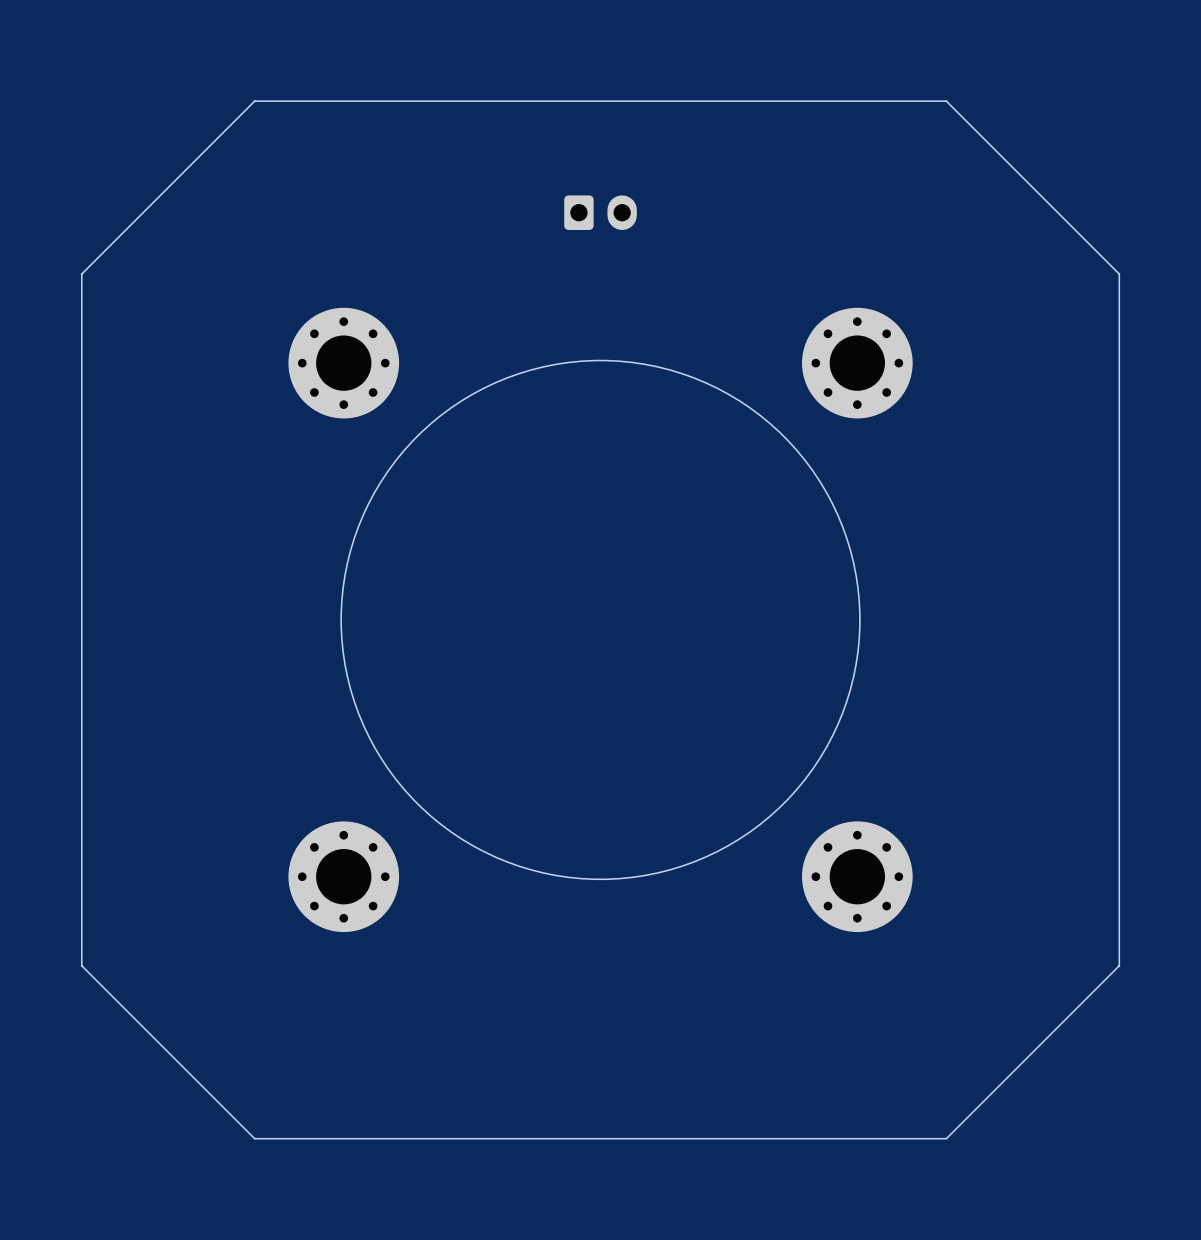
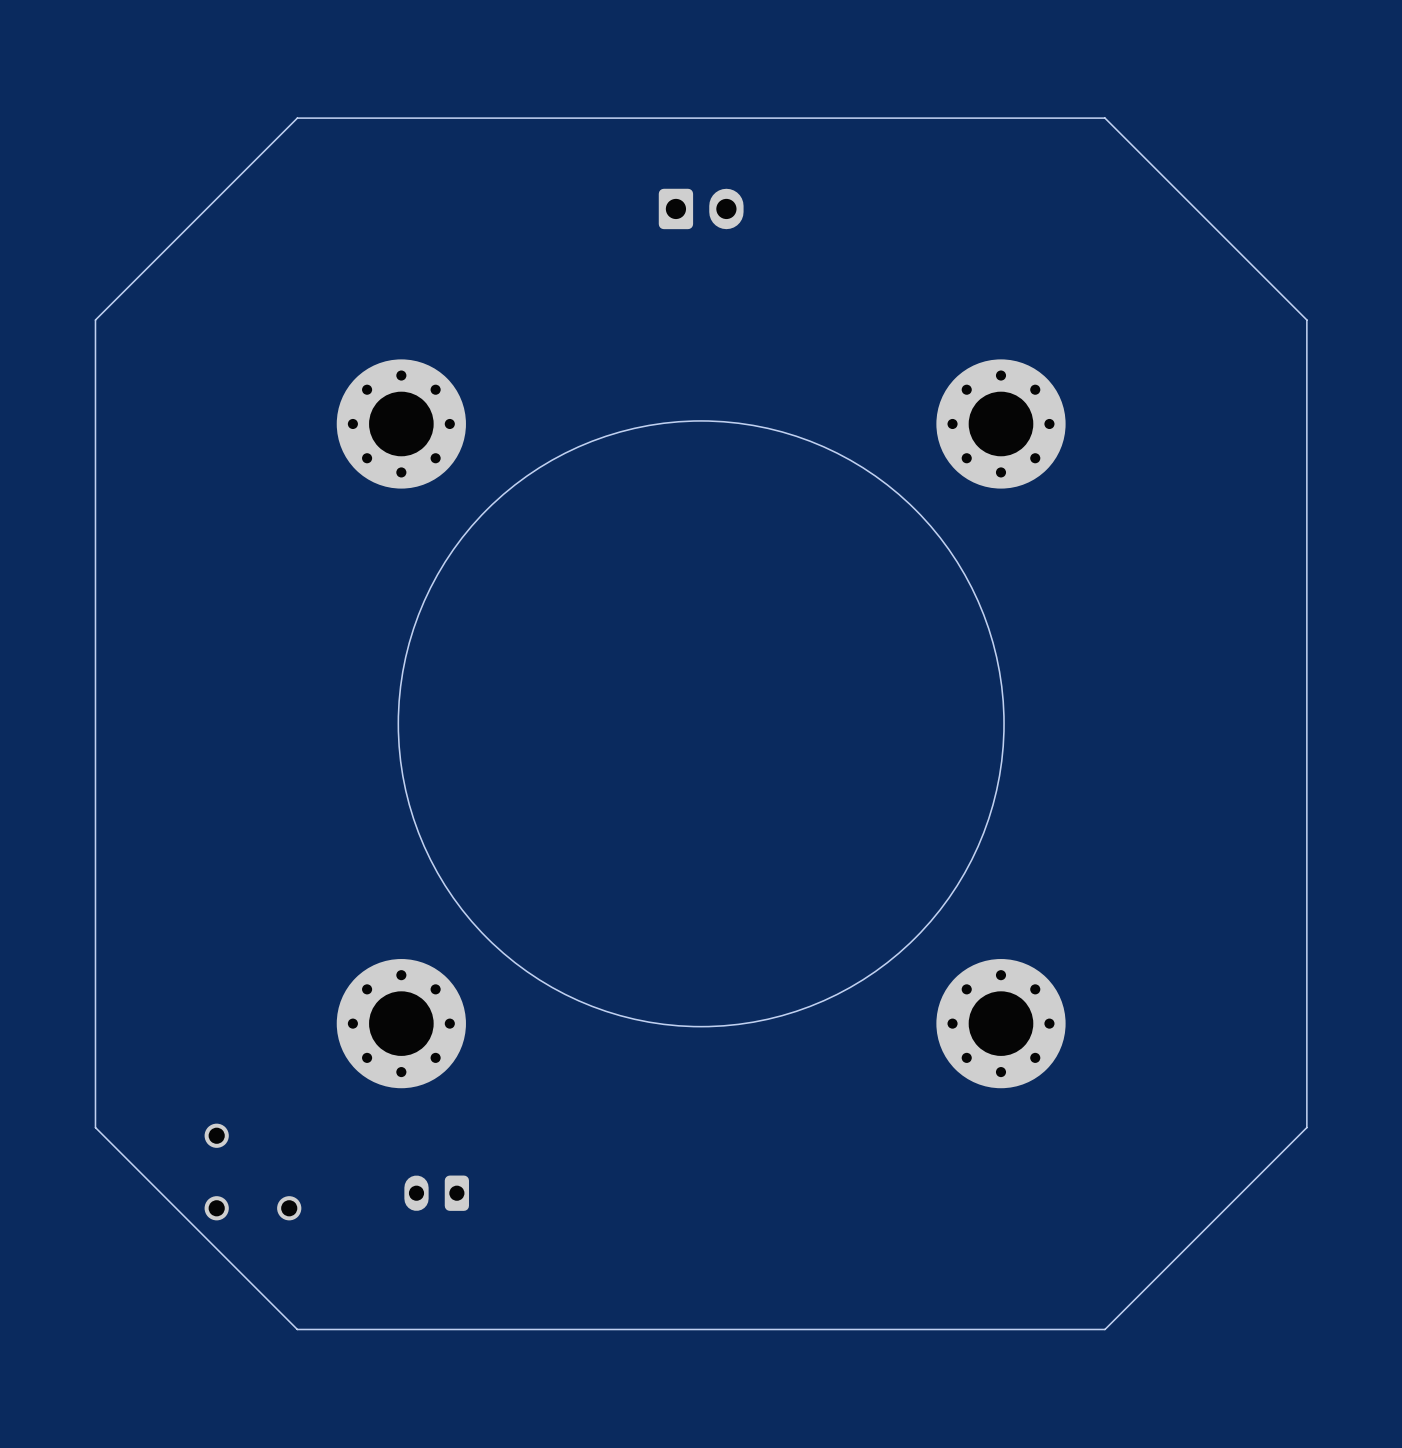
part position: (600, 212) -> (701, 208)
part: none -> (252, 1172)
part: none -> (436, 1193)

